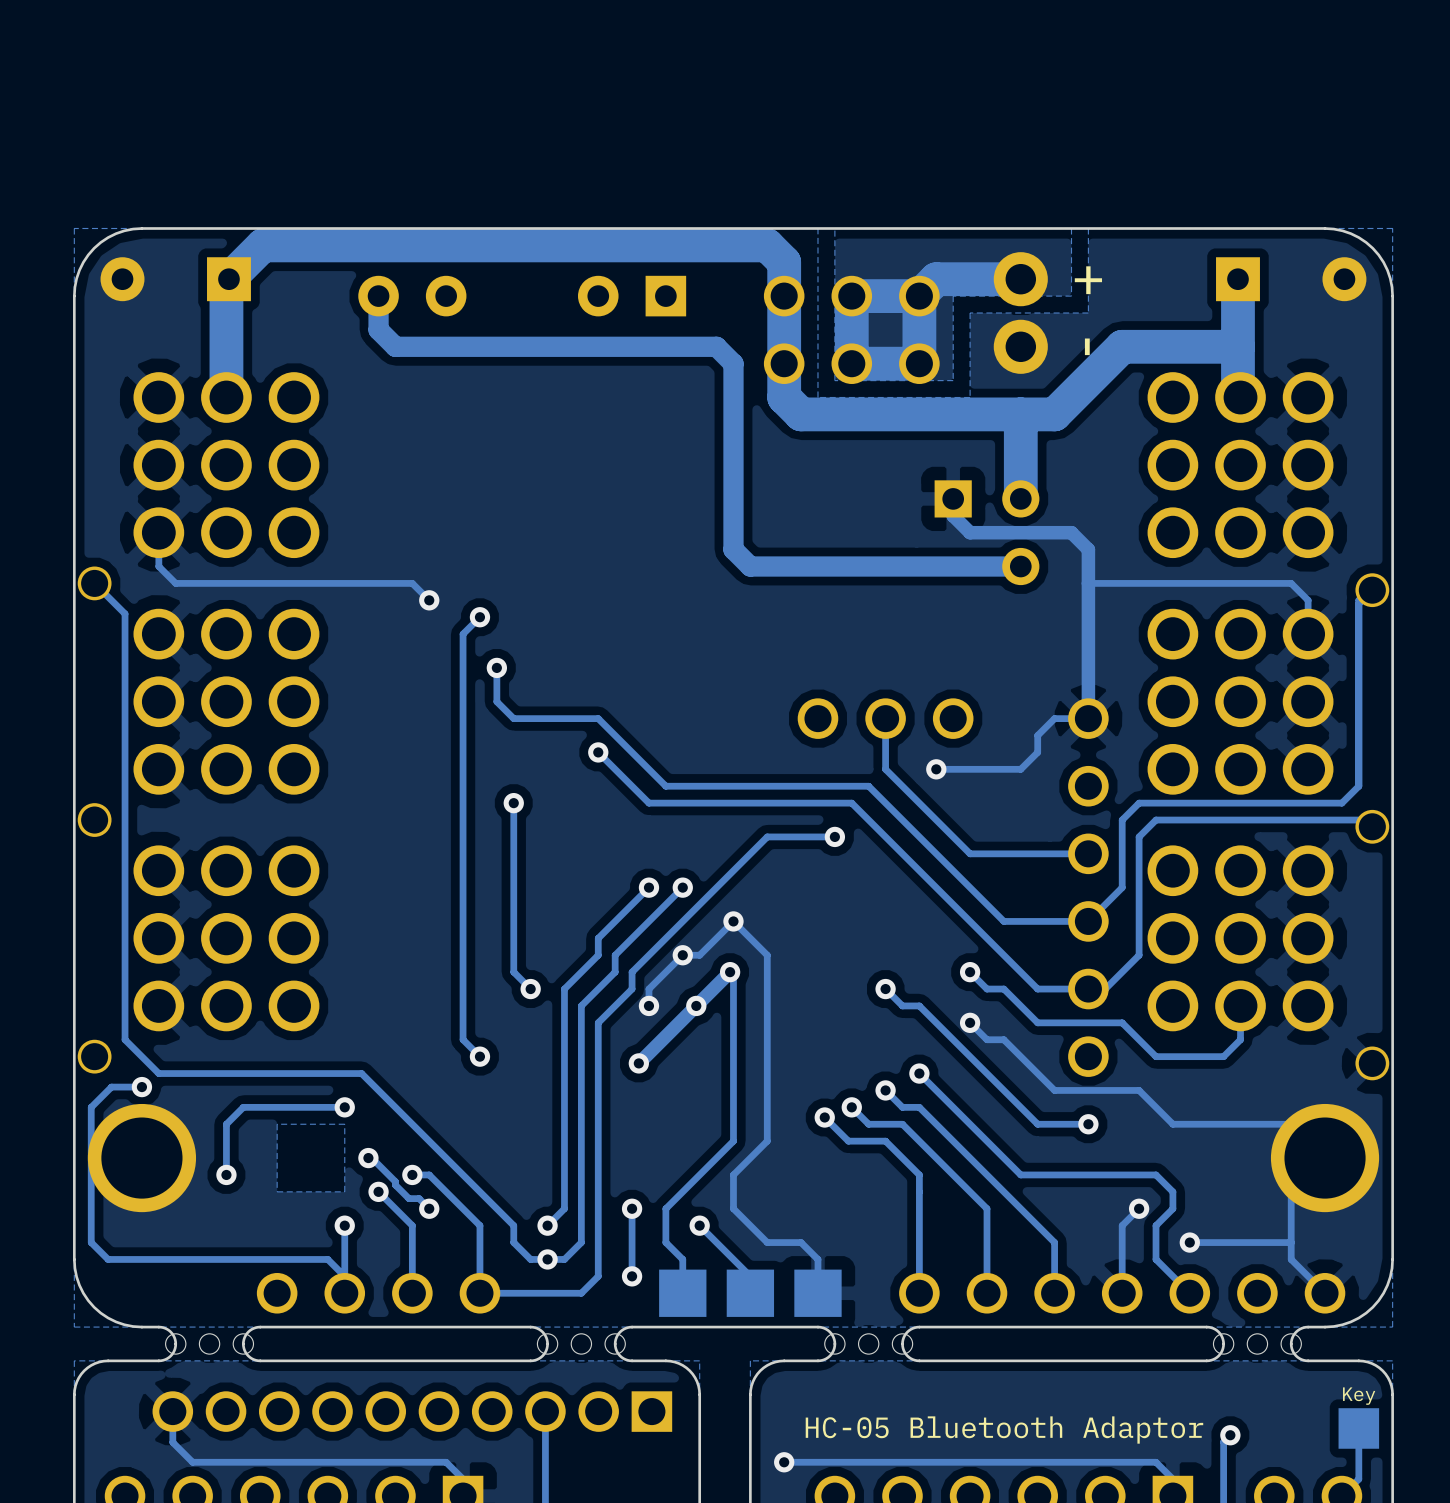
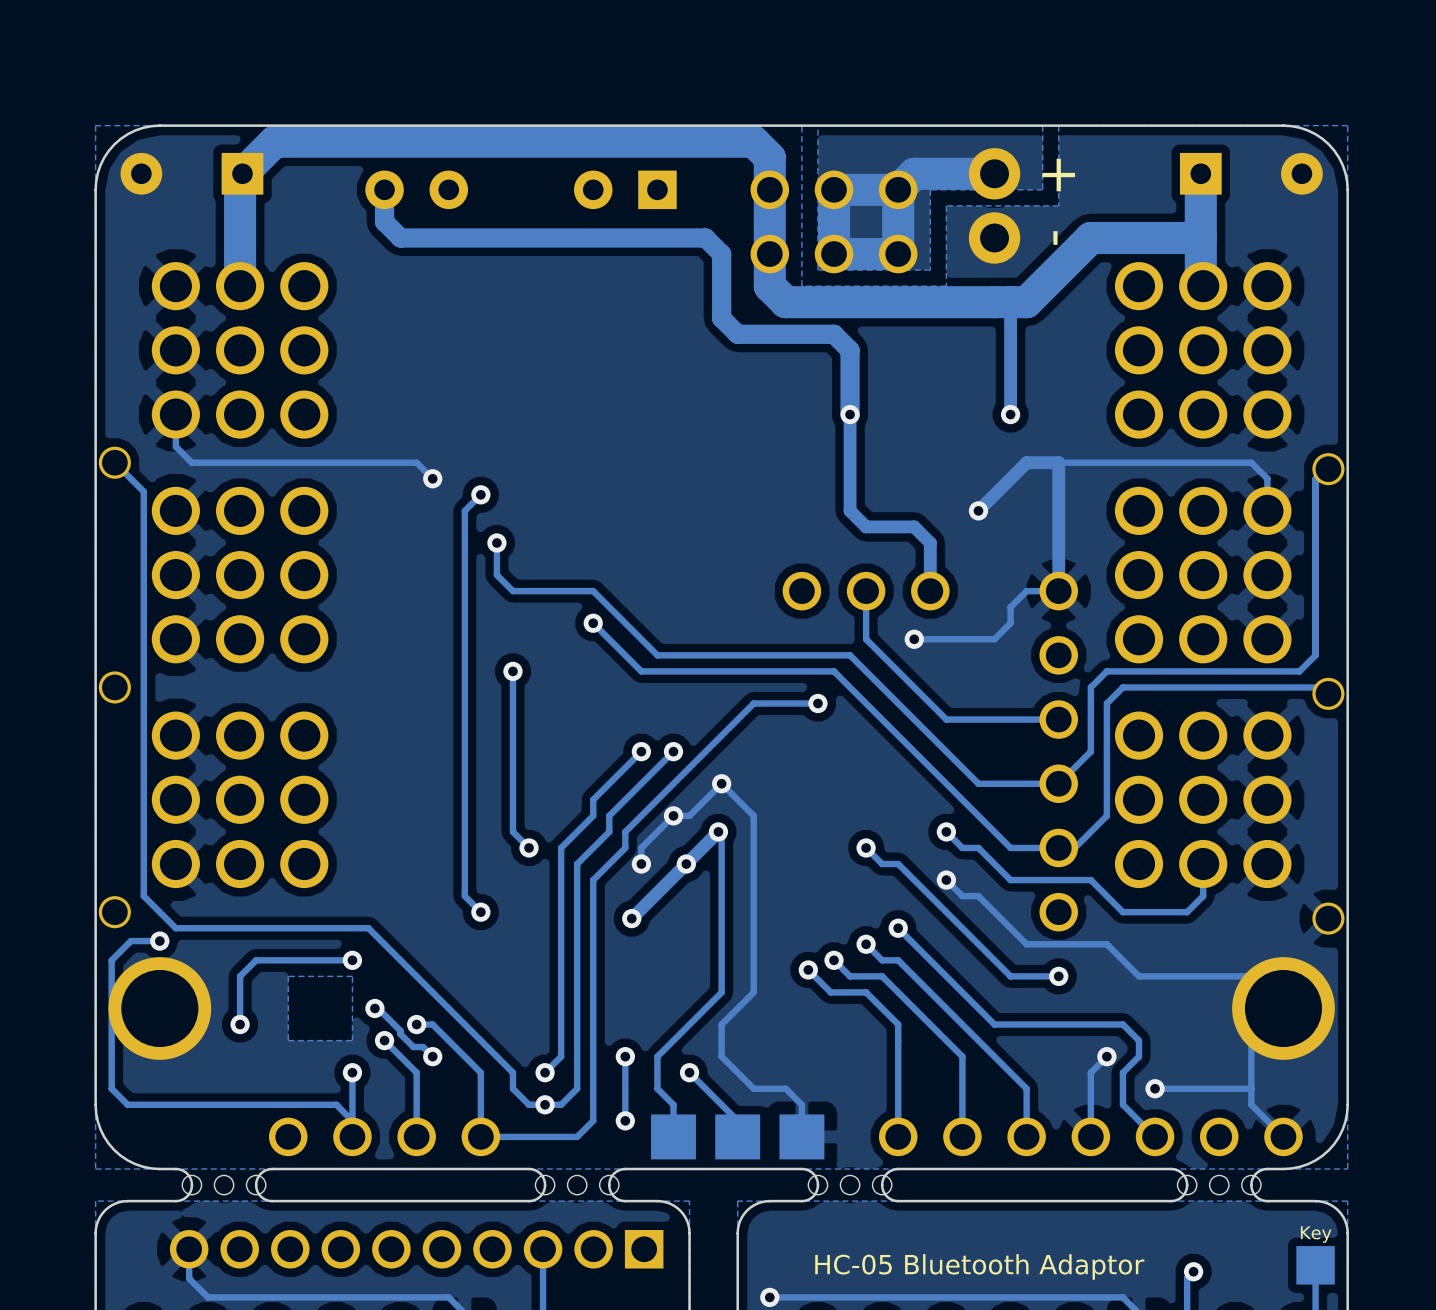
track: (1020, 414) (1020, 498) -> none
track: none -> (1010, 302) (1010, 414)
track: (733, 431) (733, 549) (750, 566) (1020, 566) -> (721, 318) (737, 334) (834, 334) (850, 350) (850, 510) (866, 526) (914, 526) (930, 542) (930, 591)
track: (953, 498) (953, 515) (970, 532) (1071, 532) (1088, 549) (1088, 583) -> (978, 510) (1026, 462) (1058, 462)
via: none -> (850, 414)
part: (987, 532) -> none
via: none -> (1010, 414)
via: none -> (978, 510)

